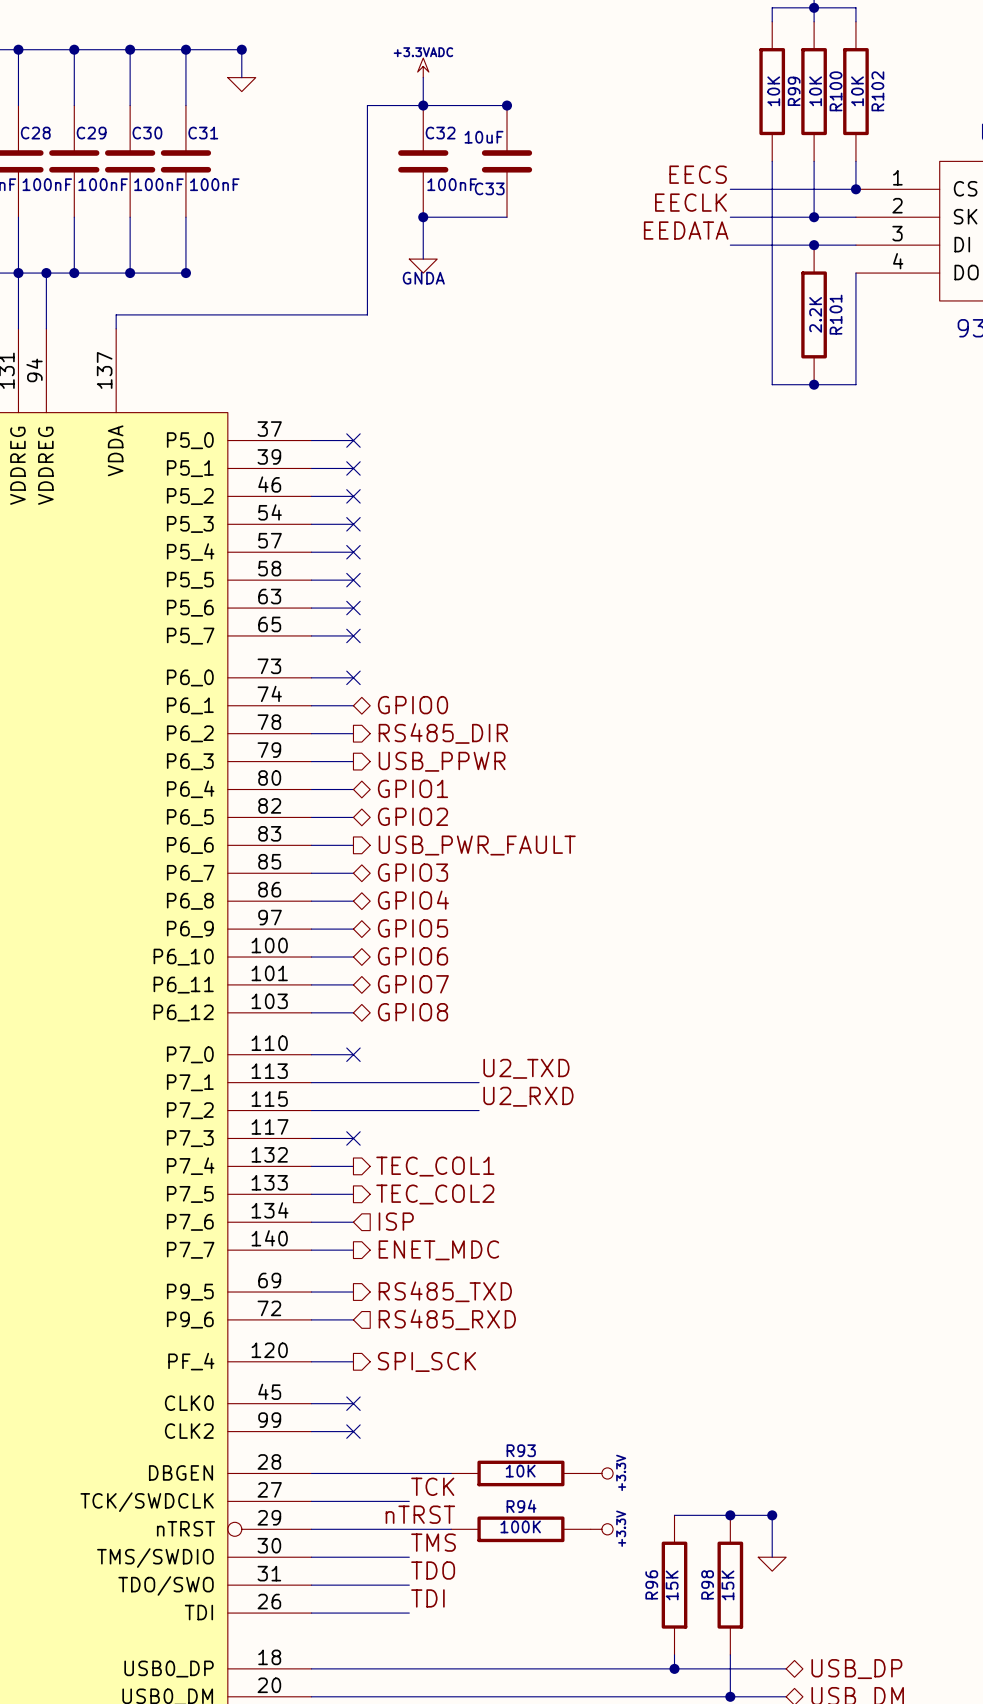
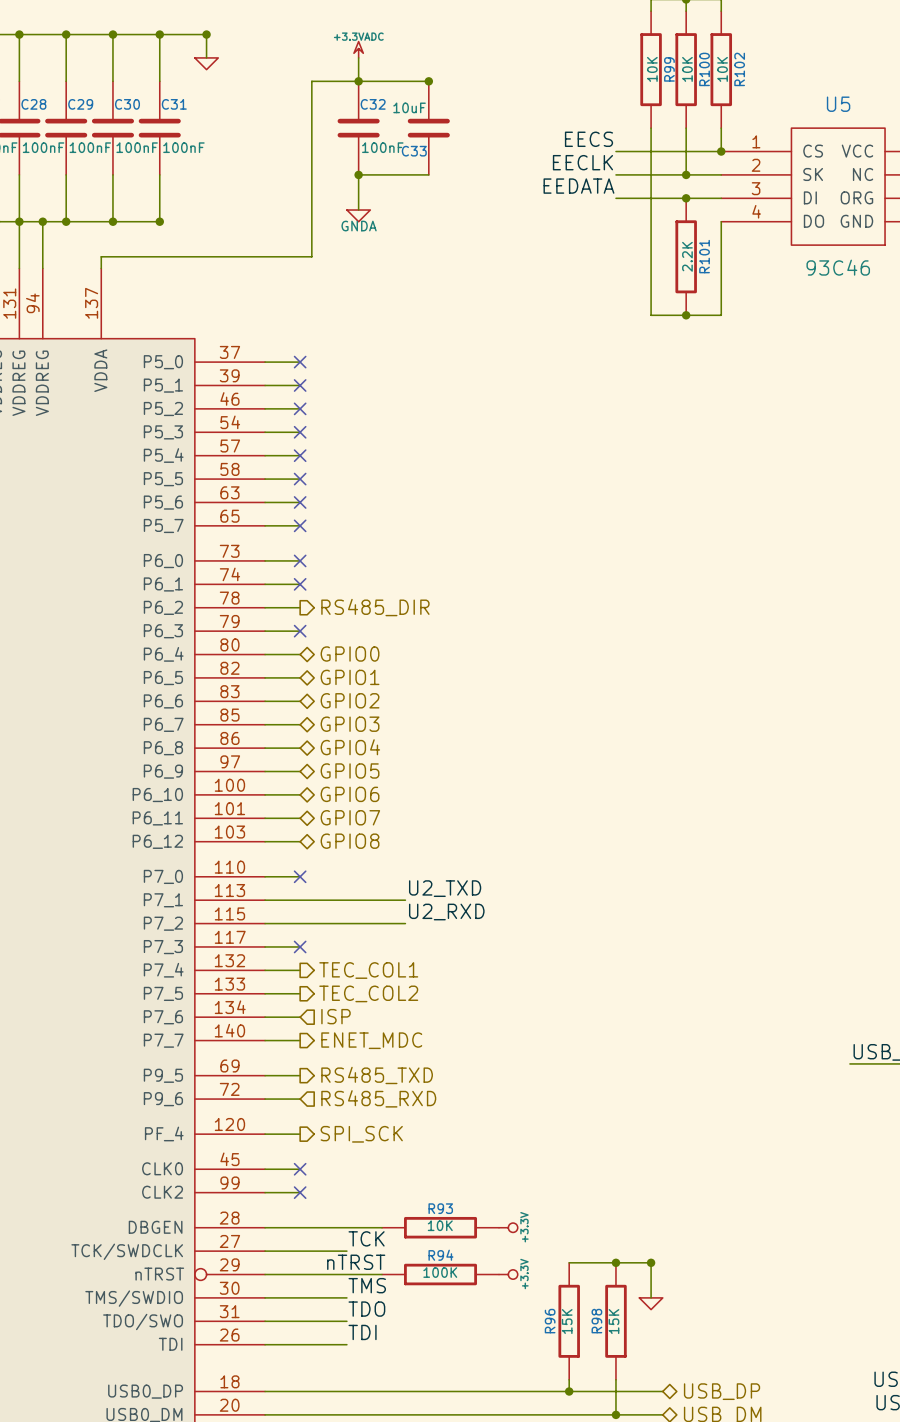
no-connect mark: none -> (300, 584)
hierarchical label: GPIO0 (412, 705) -> none
no-connect mark: none -> (300, 631)
hierarchical label: USB_PPWR (442, 761) -> none
hierarchical label: GPIO1 (412, 788) -> GPIO0 (350, 654)
hierarchical label: GPIO2 (412, 816) -> GPIO1 (350, 677)
hierarchical label shape: output (477, 845) -> bidirectional (350, 700)
hierarchical label: USB_PWR_FAULT (477, 845) -> GPIO2 (350, 700)

